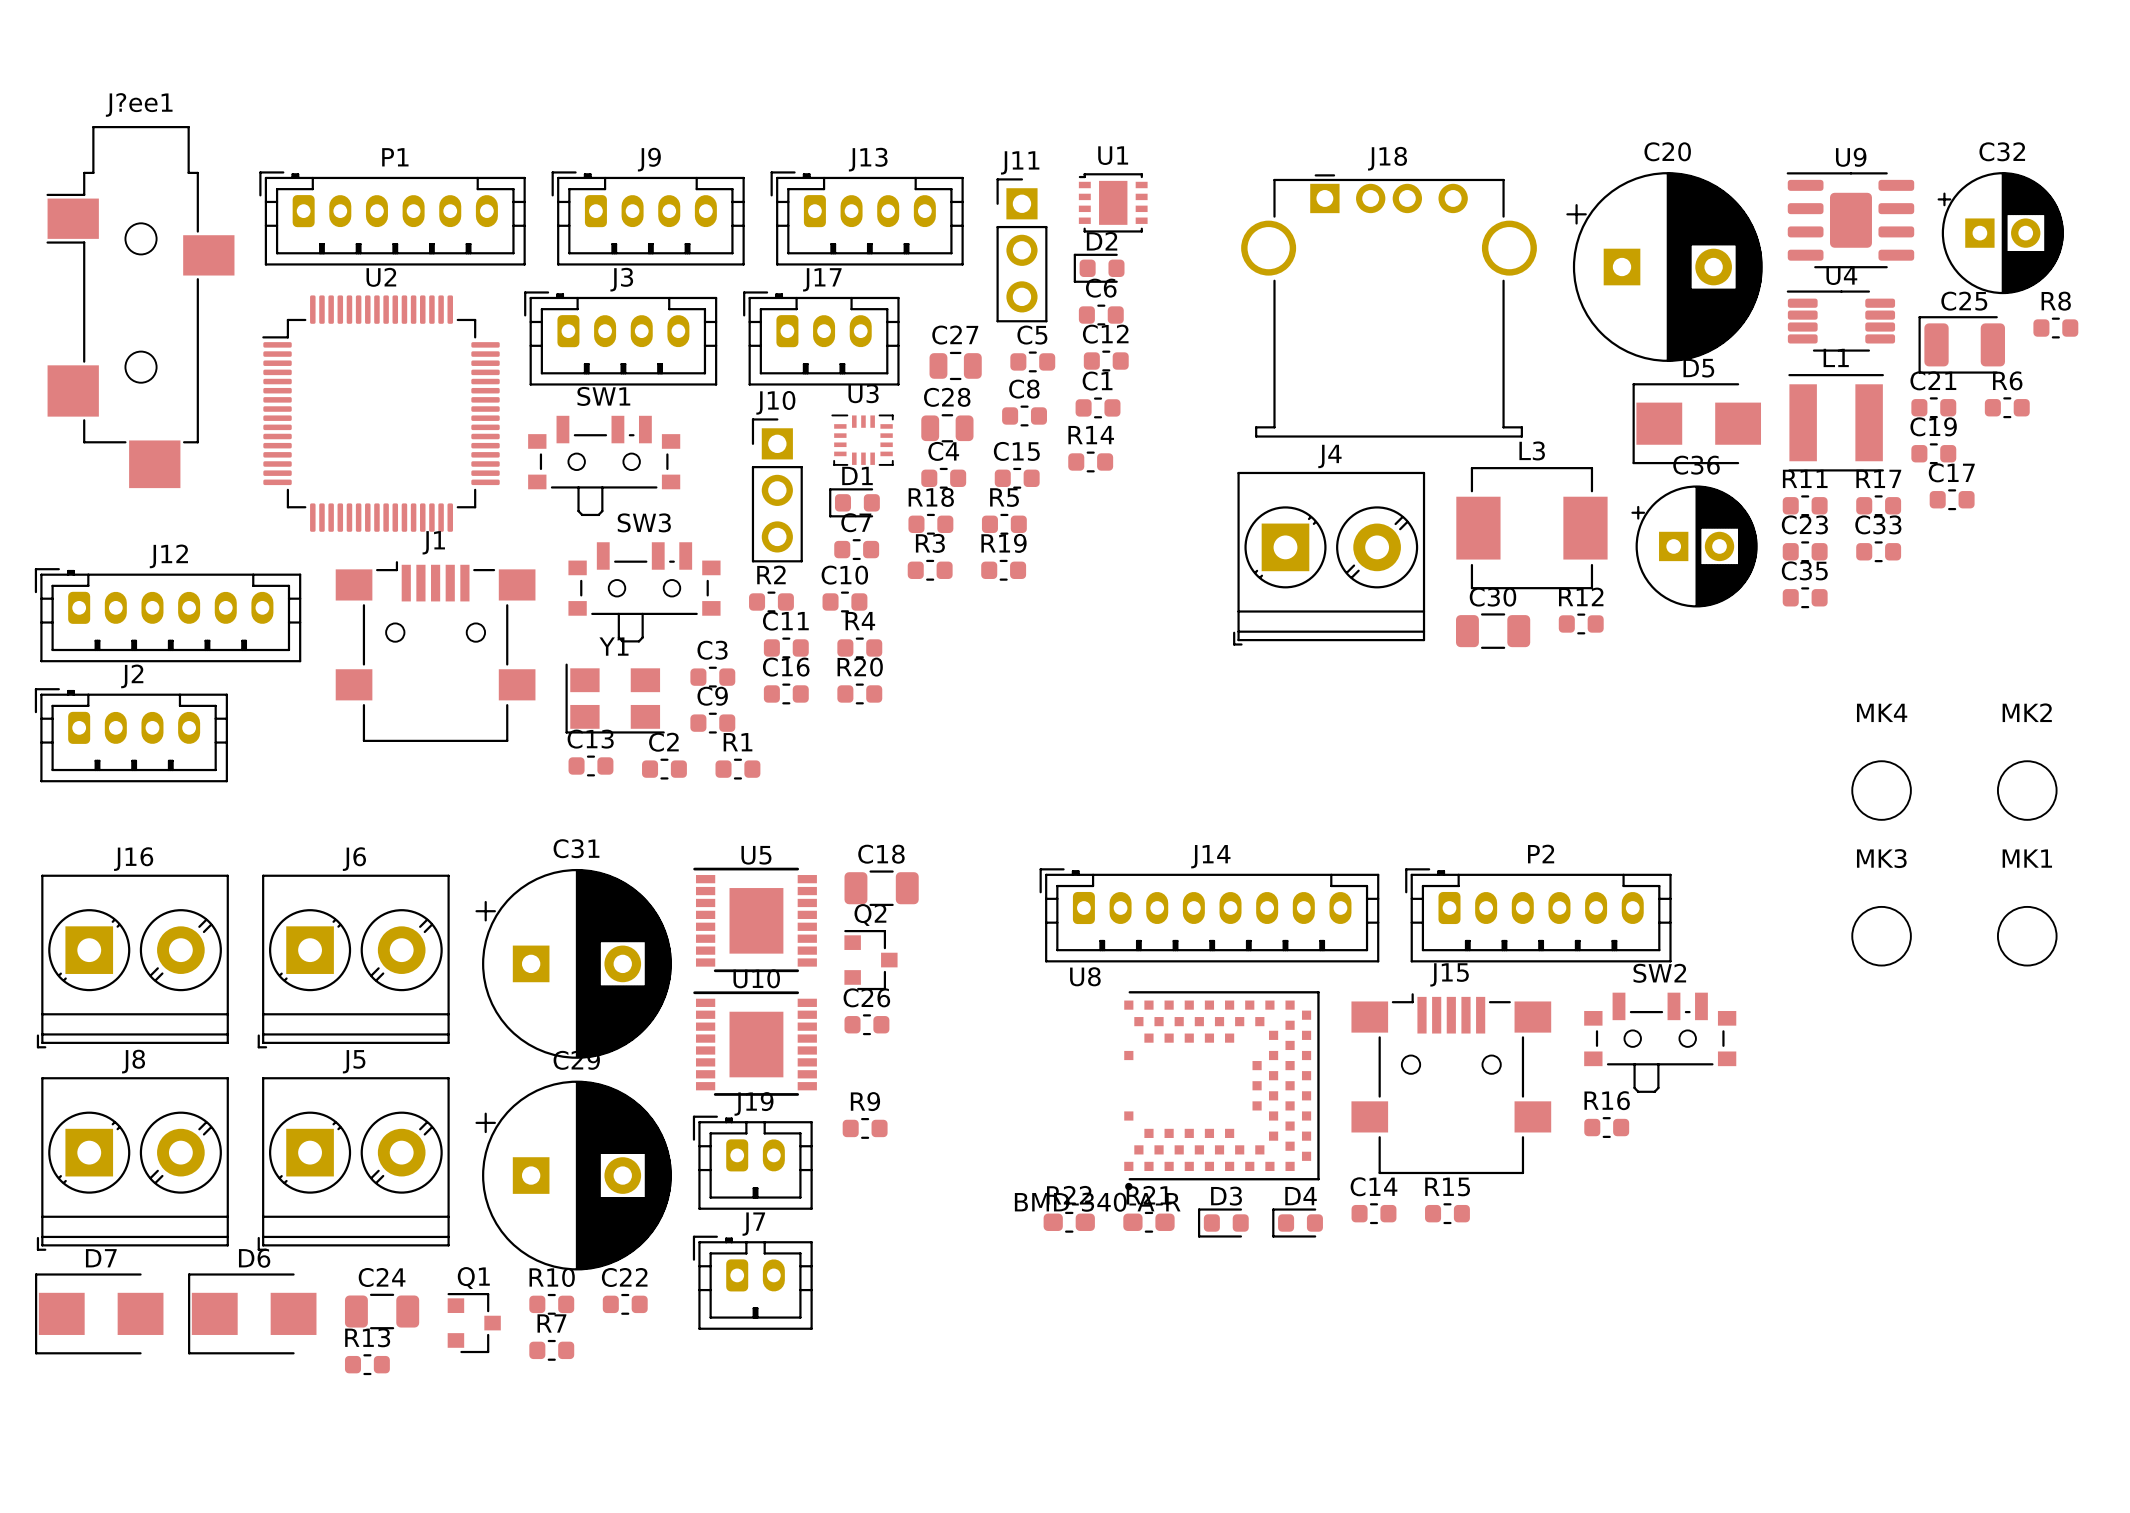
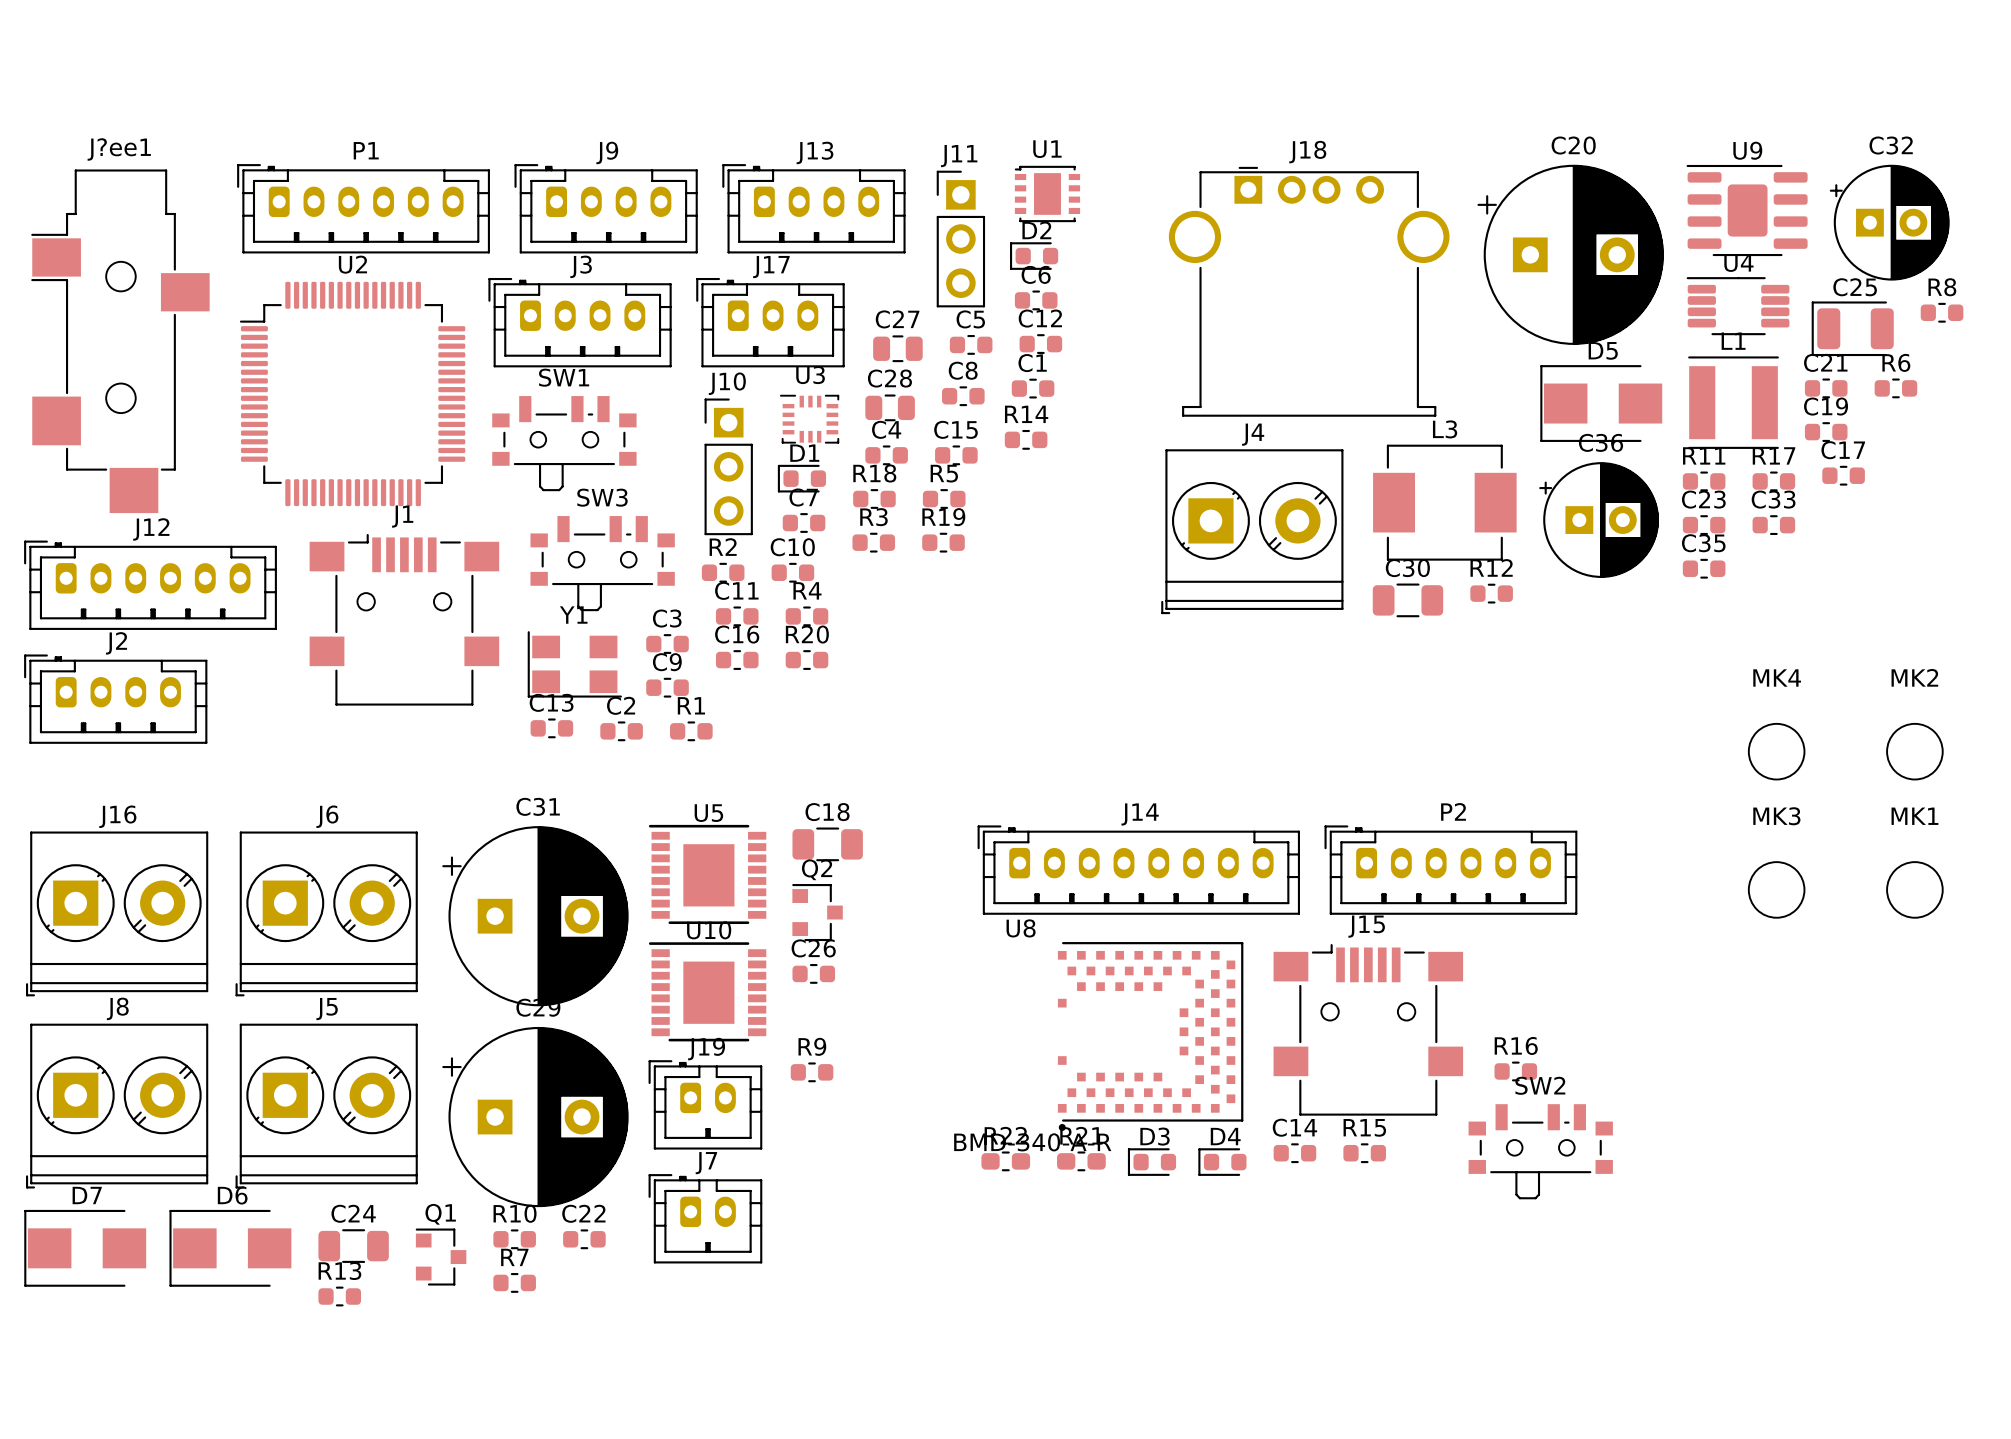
J?ee1 position: (140, 307) -> (120, 341)
SW2 position: (1660, 1042) -> (1540, 1151)

